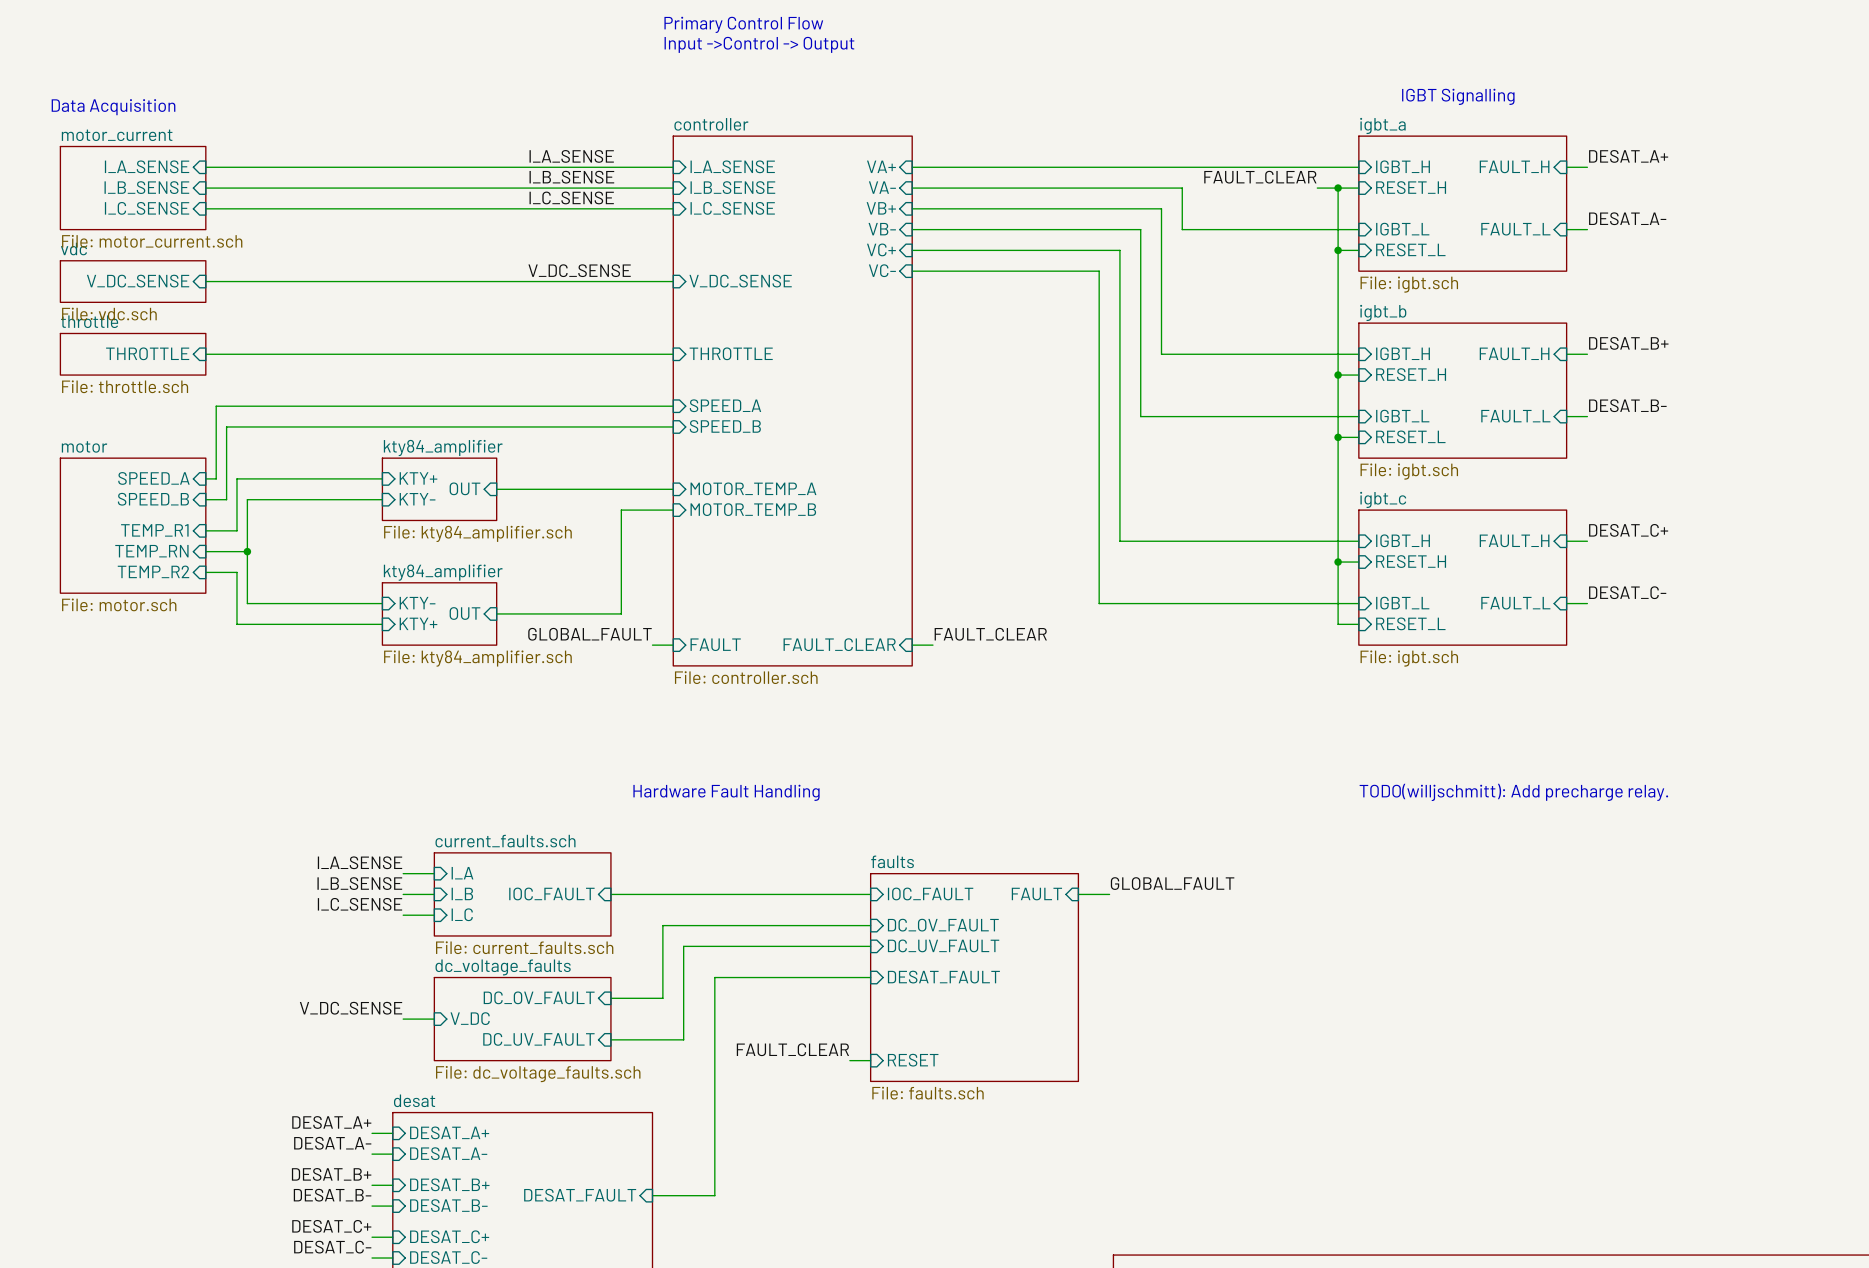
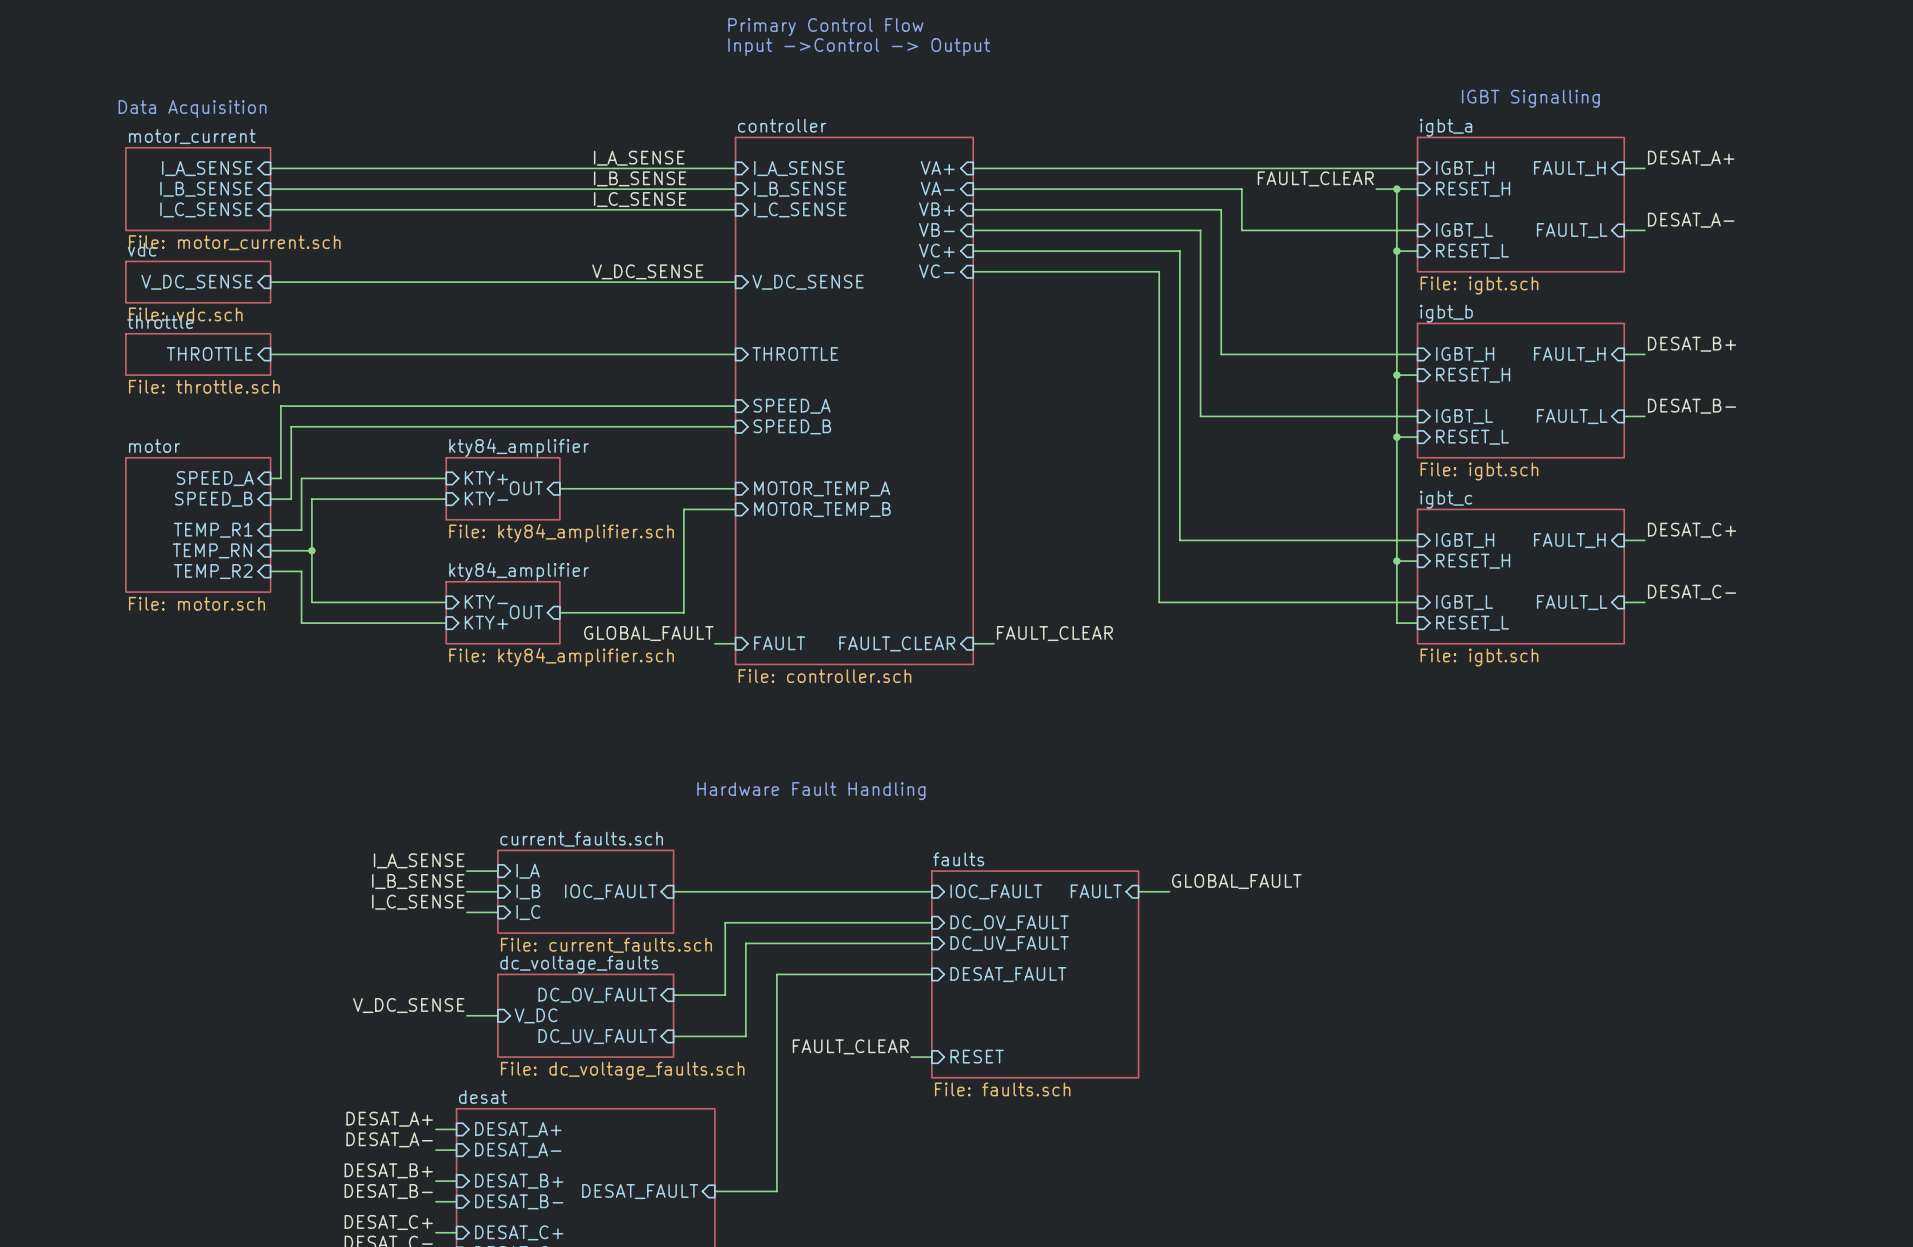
text: TODO(willjschmitt): Add precharge relay. (1513, 792) -> none

